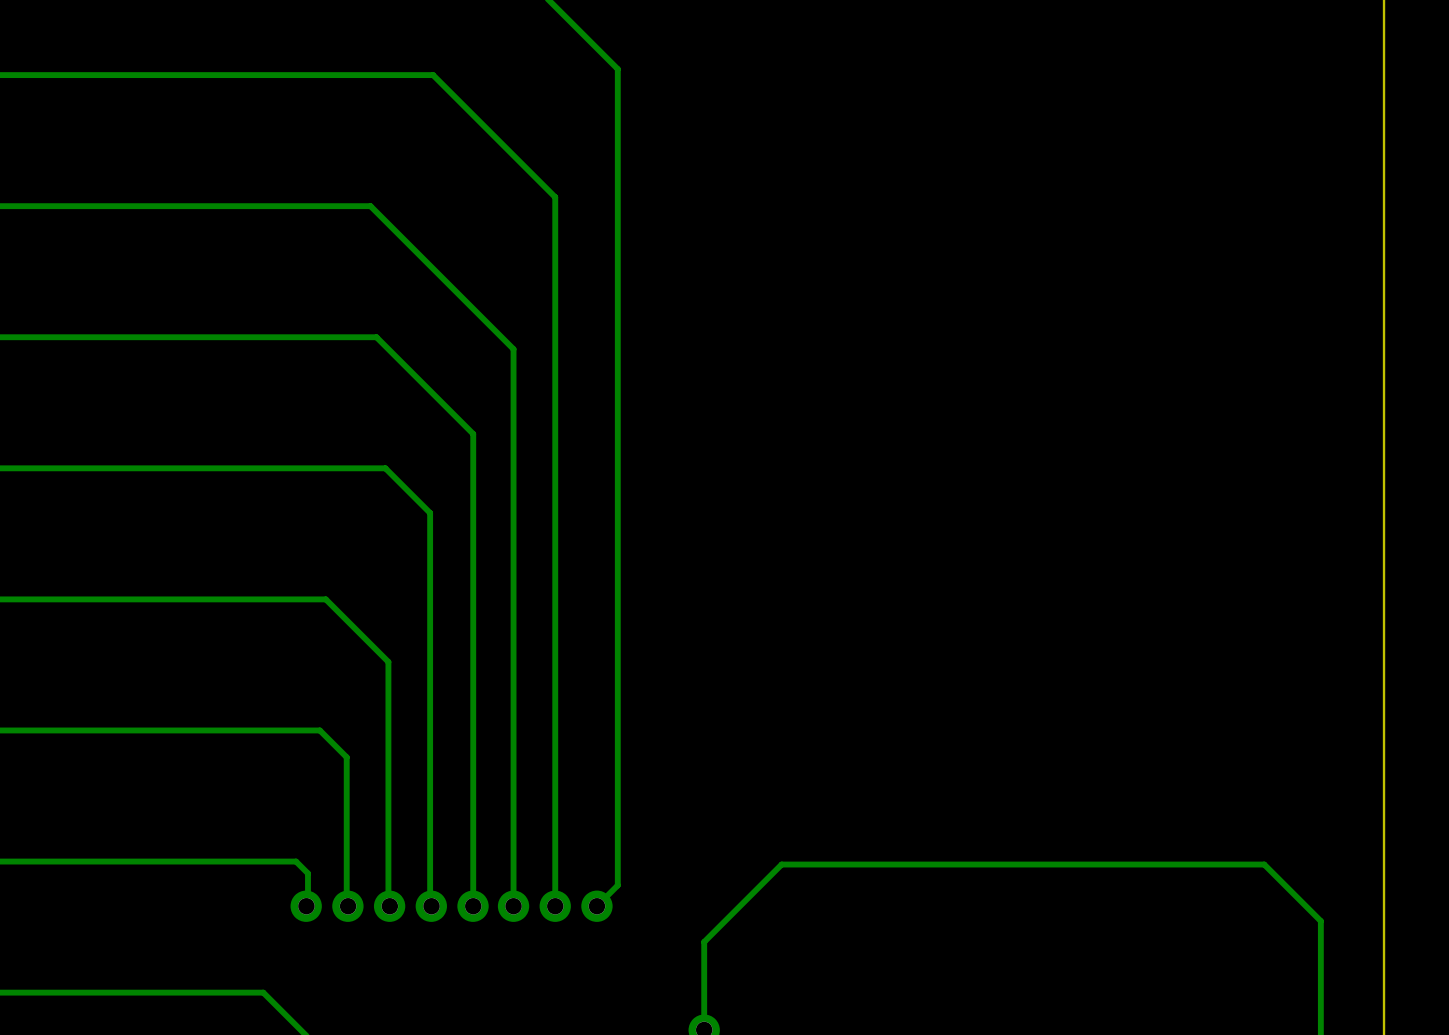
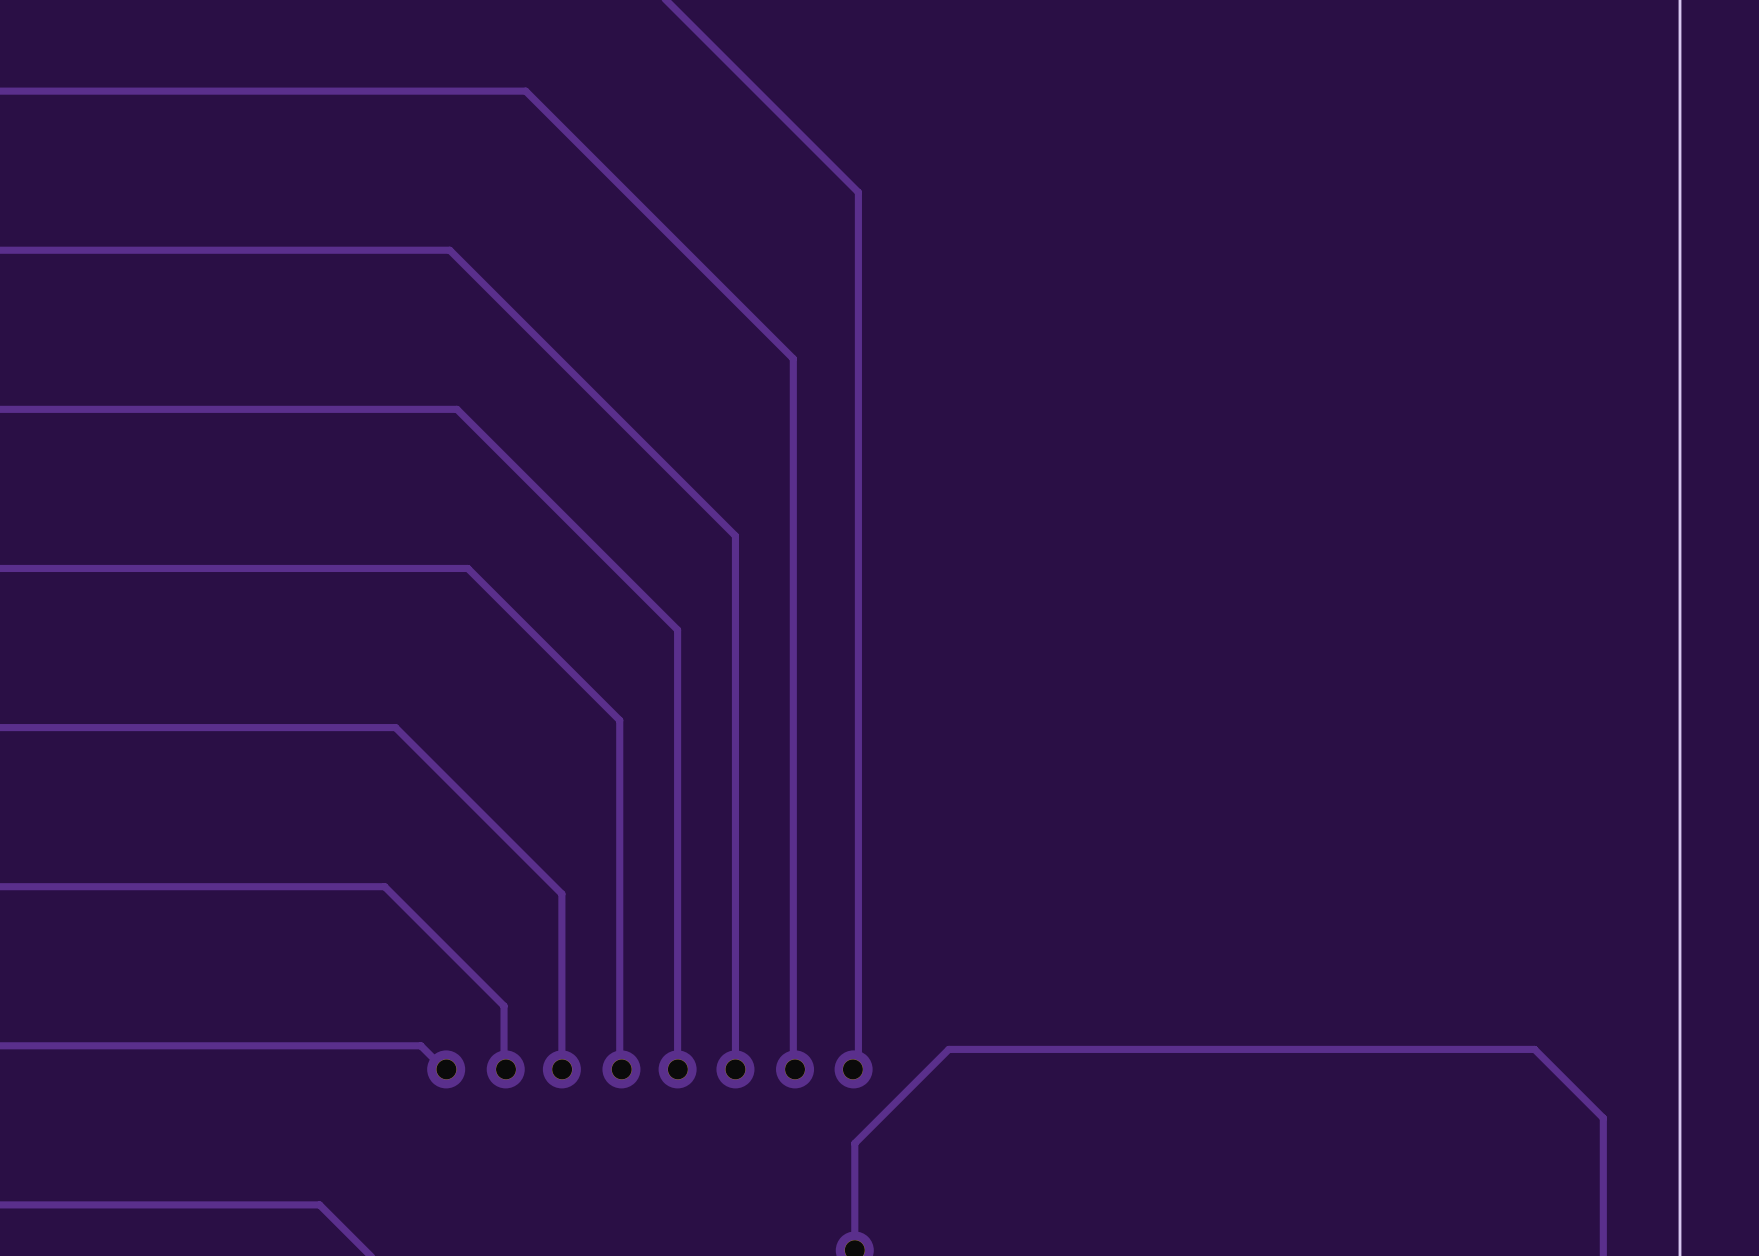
track: (617, 69) (617, 885) (596, 906) -> (749, 83) (858, 192) (858, 1071)
track: (555, 197) (555, 906) -> (673, 239) (793, 358) (793, 1078)
track: (513, 349) (513, 906) -> (623, 423) (735, 535) (735, 1071)
track: (473, 433) (473, 906) -> (574, 526) (677, 629) (677, 1071)
track: (430, 513) (430, 906) -> (522, 622) (619, 720) (619, 1071)
track: (388, 661) (388, 906) -> (471, 803) (561, 893) (561, 1063)
track: (316, 730) (319, 730) (346, 757) (346, 903) -> (384, 886) (504, 1006) (504, 1071)
track: (296, 861) (307, 873) (307, 903) -> (359, 1045) (420, 1045) (446, 1071)
drawing: none -> [427, 1050, 873, 1089]
via: none -> (446, 1069)
via: none -> (506, 1069)
via: none -> (562, 1069)
via: none -> (621, 1069)
via: none -> (677, 1069)
via: none -> (735, 1069)
via: none -> (795, 1069)
via: none -> (852, 1069)
drawing: [290, 890, 613, 922] -> none
via: (306, 906) -> none
via: (348, 906) -> none
via: (389, 906) -> none
via: (431, 906) -> none
via: (473, 906) -> none
via: (513, 906) -> none
via: (555, 906) -> none
via: (596, 906) -> none

